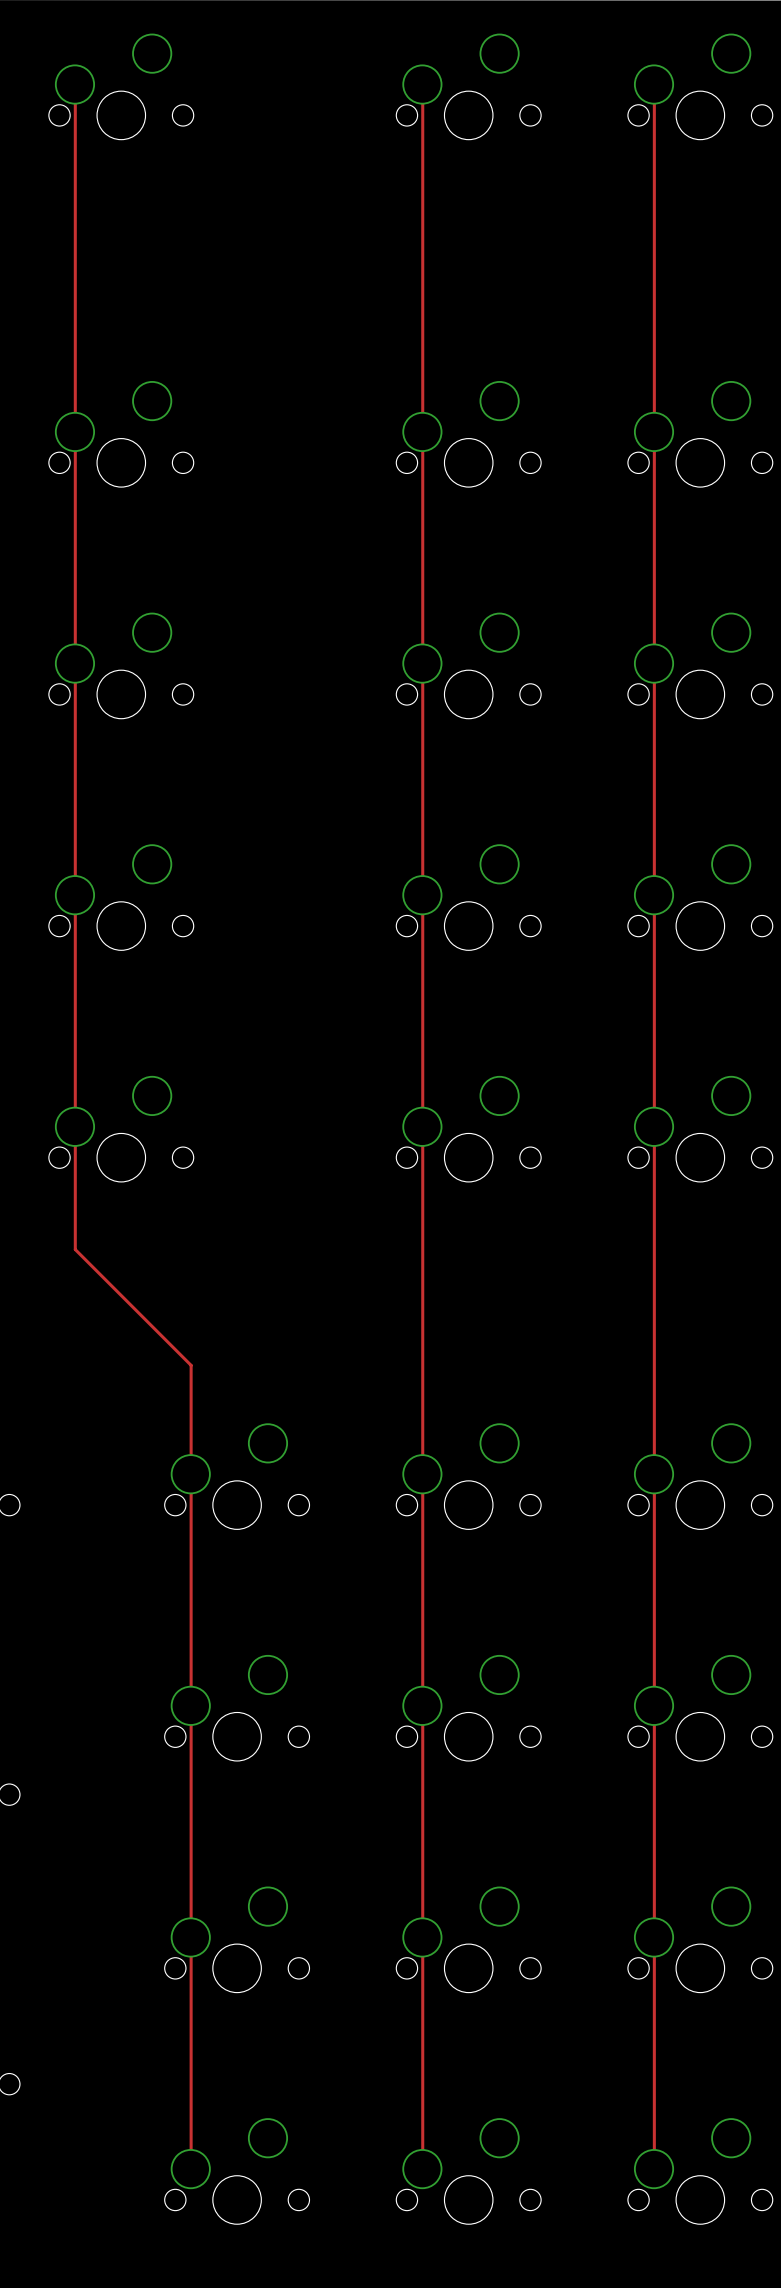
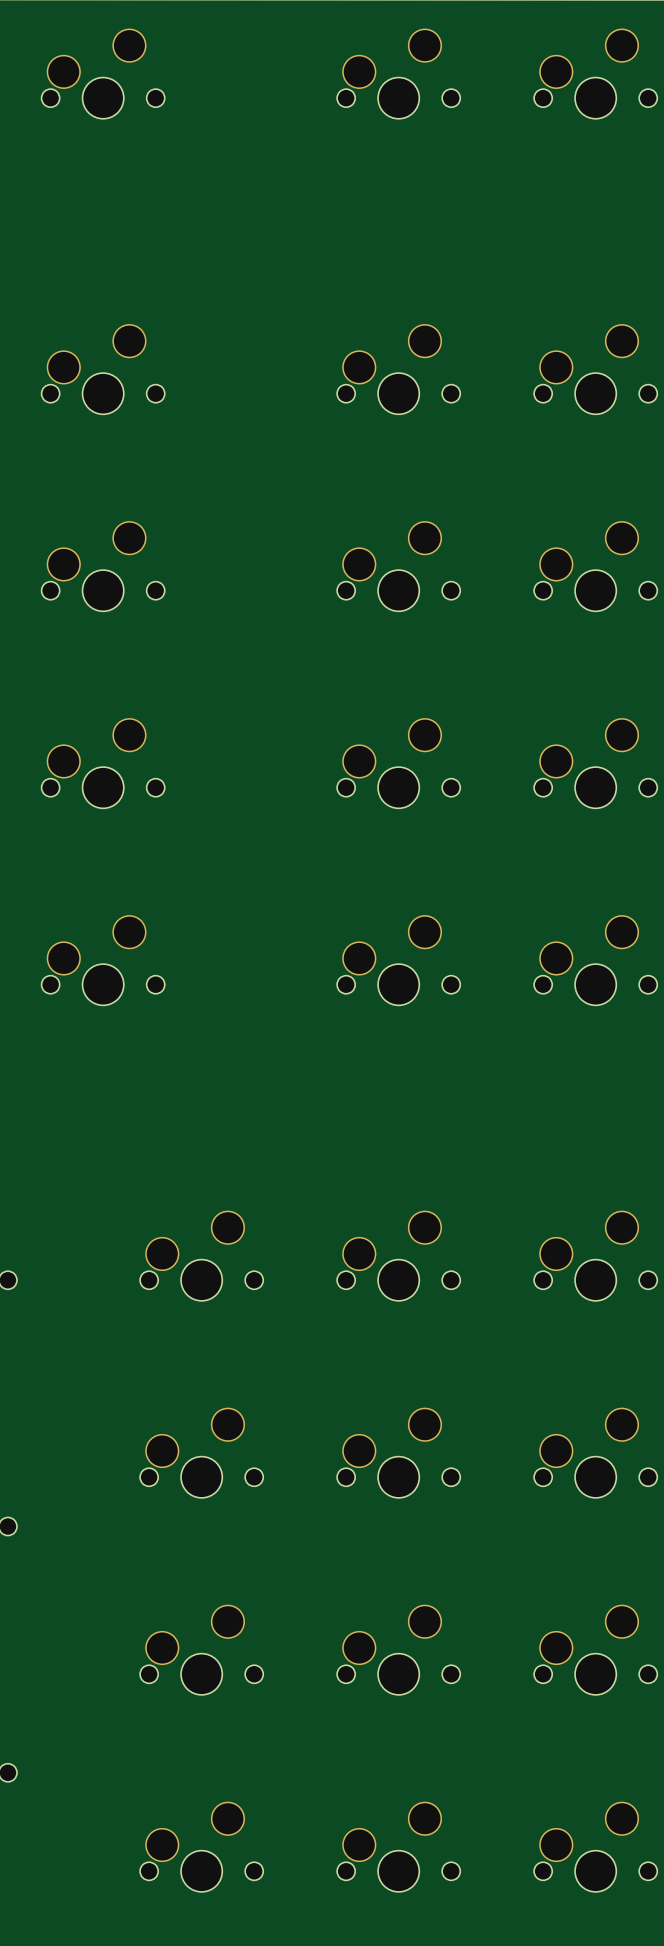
track: (75, 84) (75, 1249) (191, 1365) (191, 2168) -> none
track: (422, 84) (422, 2168) -> none
track: (654, 84) (654, 2168) -> none

